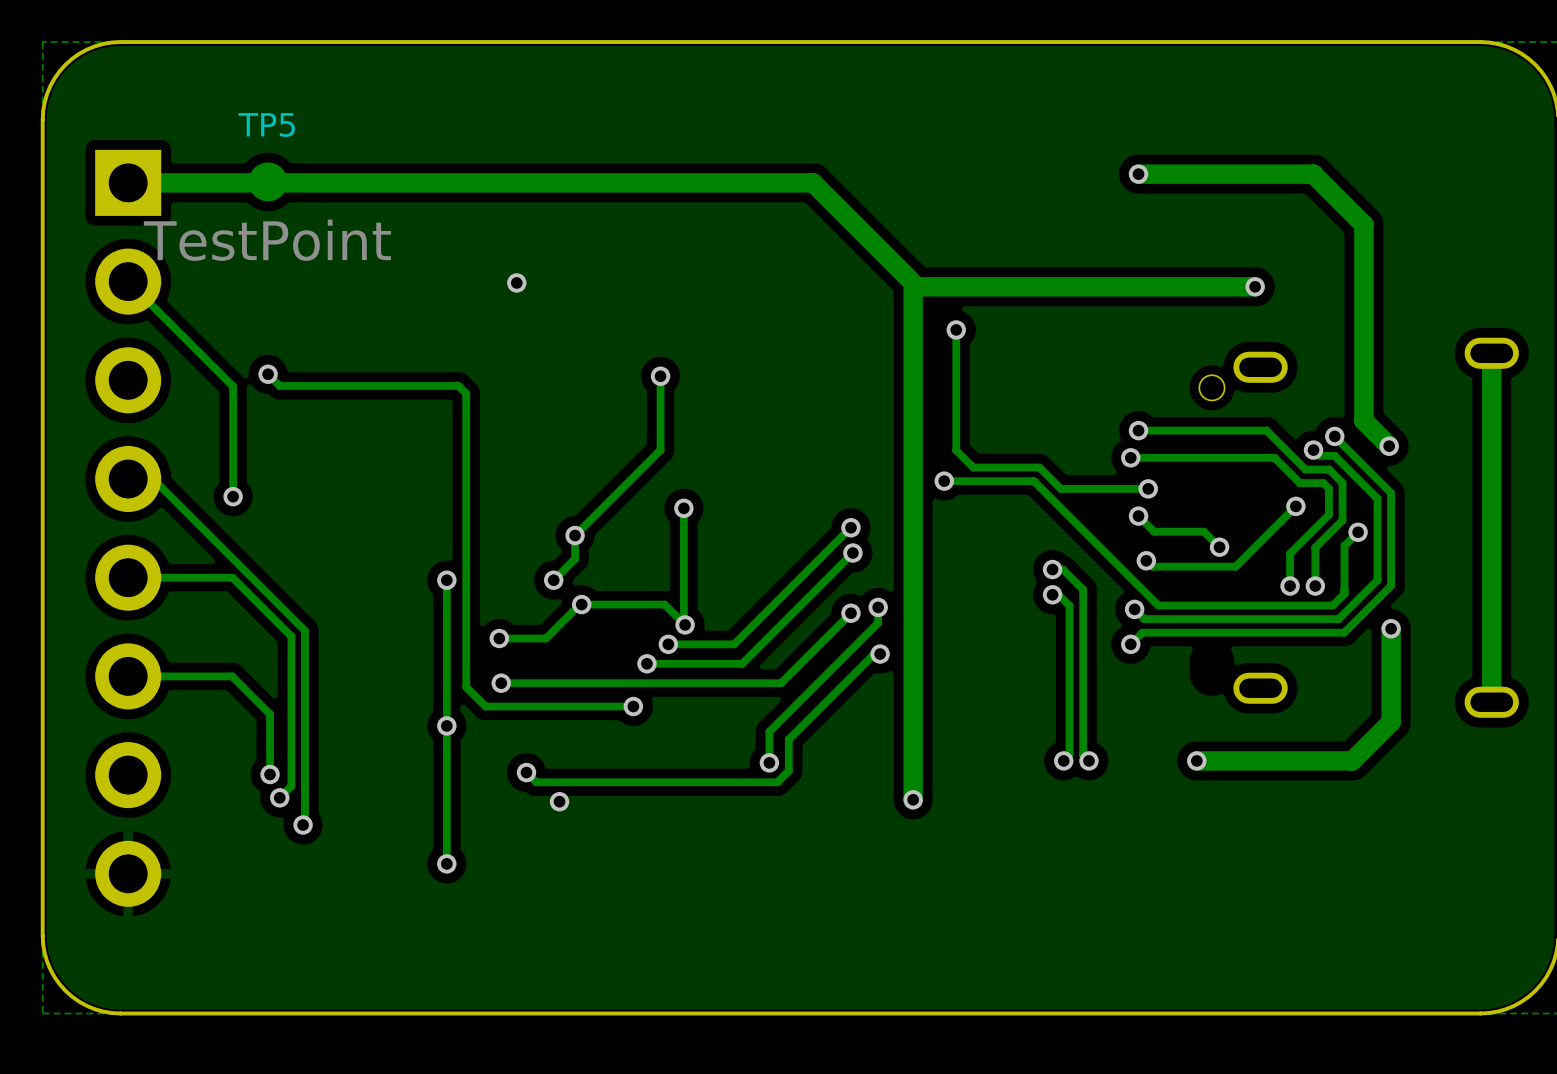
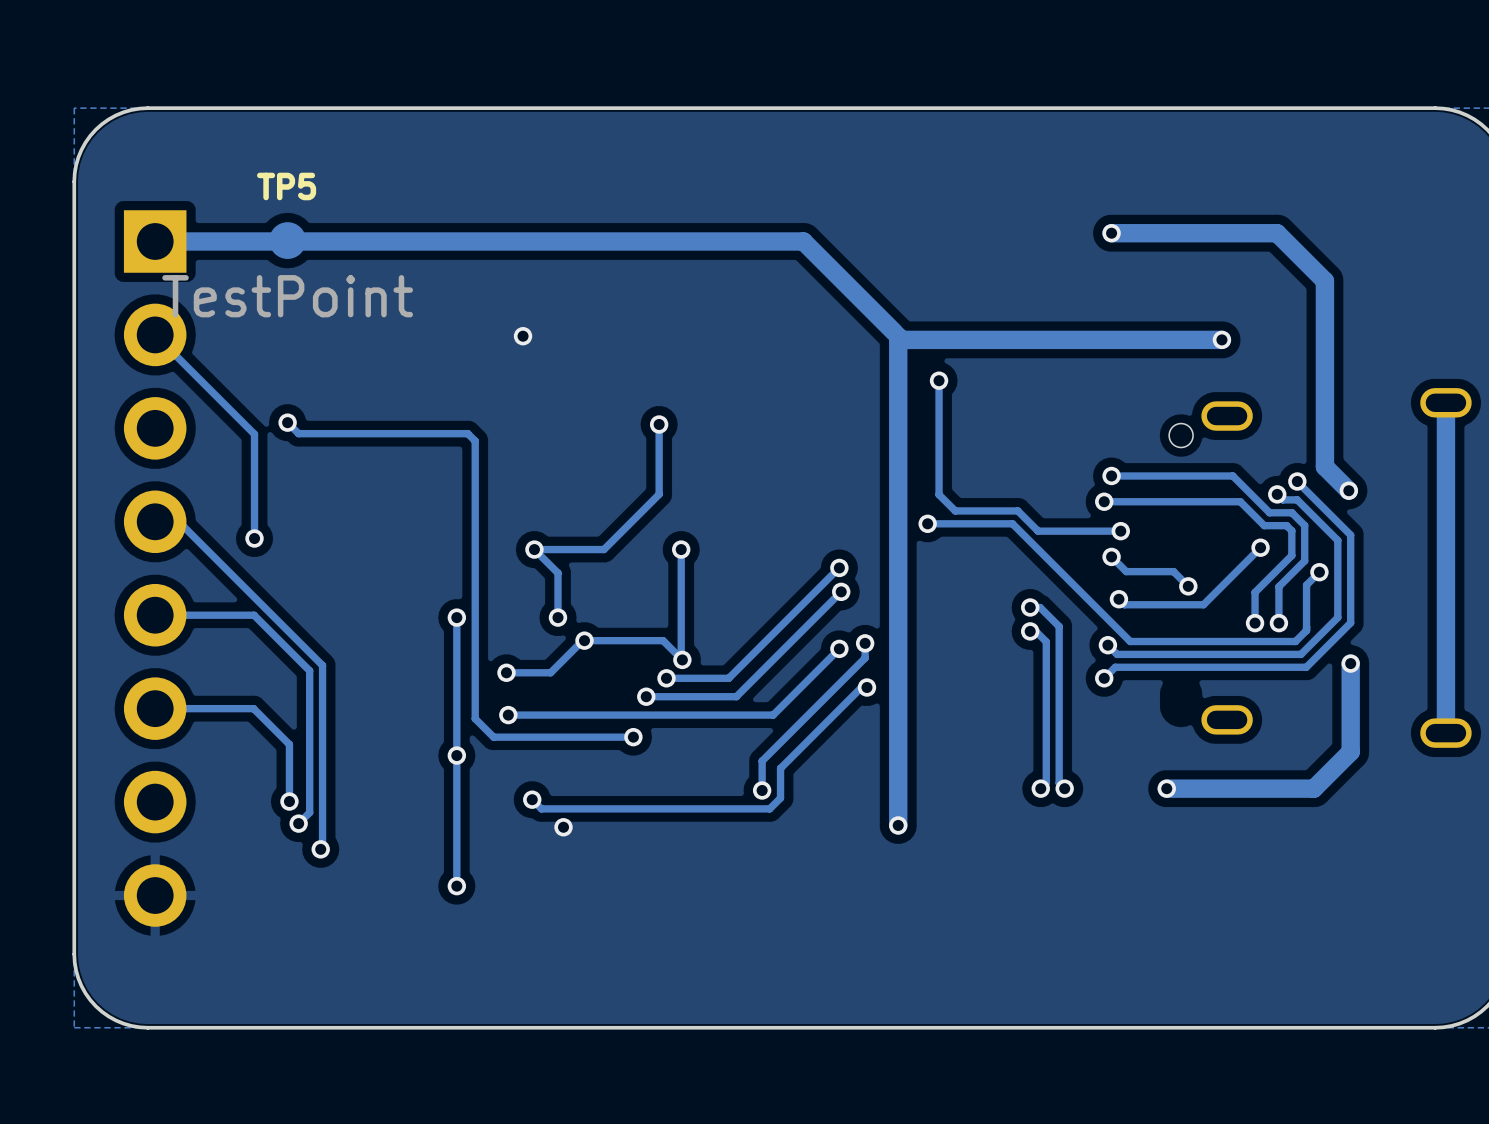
track: (602, 508) (575, 535) (575, 558) (553, 580) -> (603, 549) (534, 549) (557, 573) (557, 617)
via position: (575, 535) -> (534, 549)

